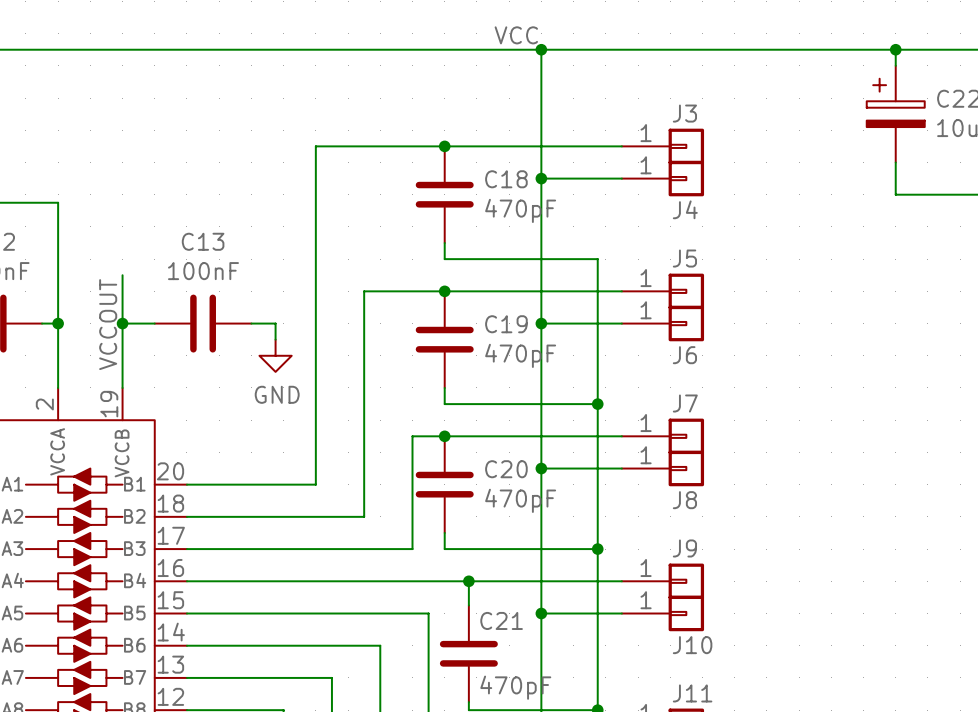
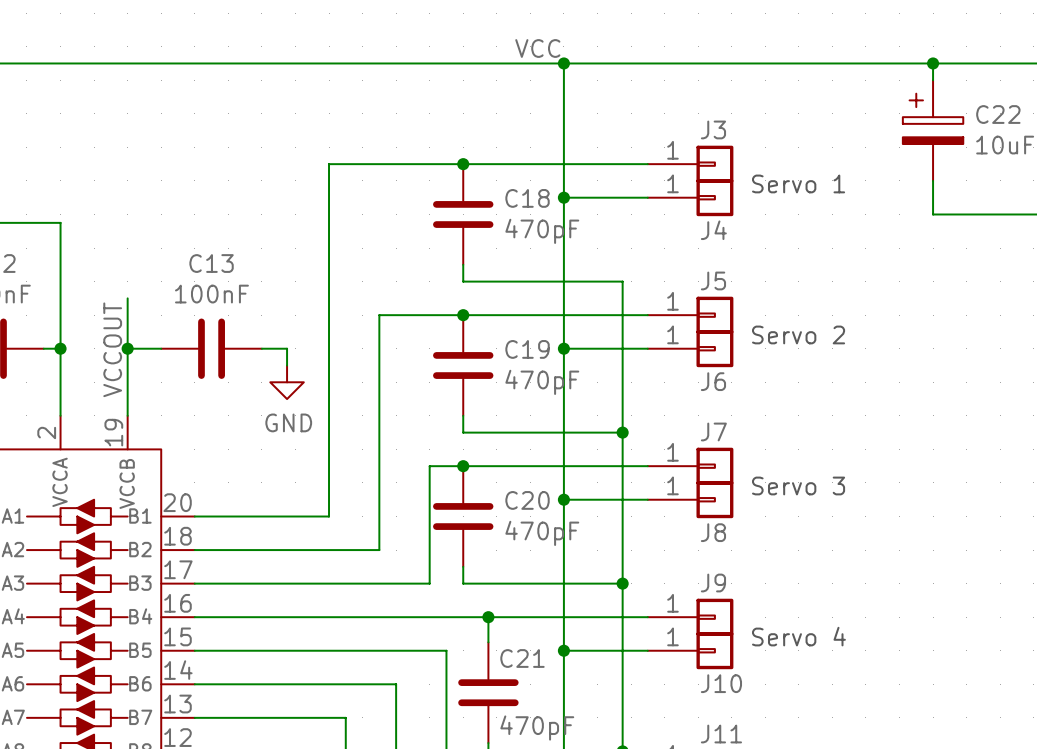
text: none -> Servo 1 (798, 183)
text: none -> Servo 2 (798, 334)
text: none -> Servo 3 (798, 485)
text: none -> Servo 4 (798, 636)

